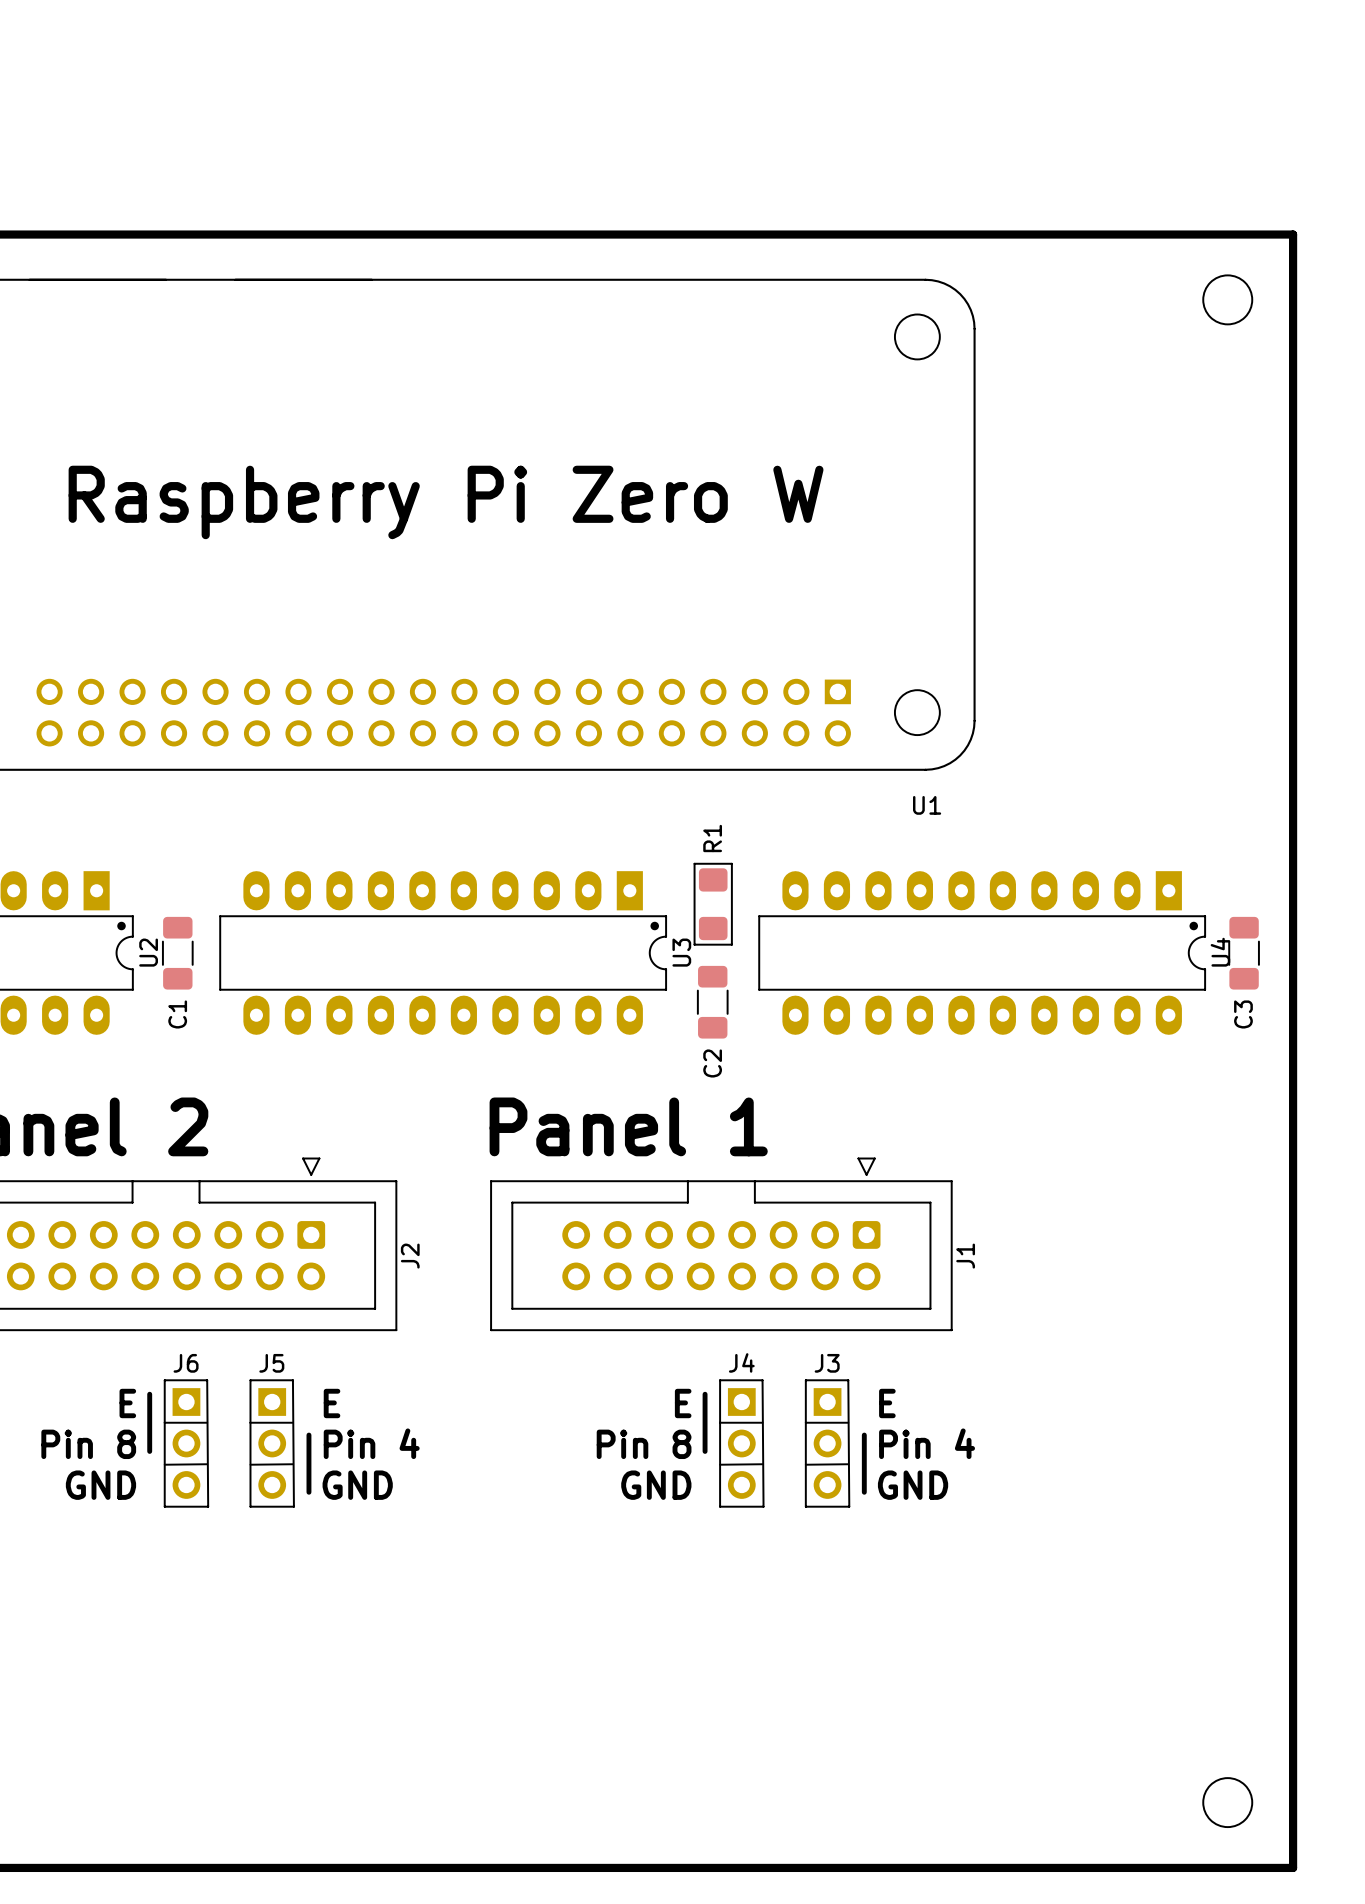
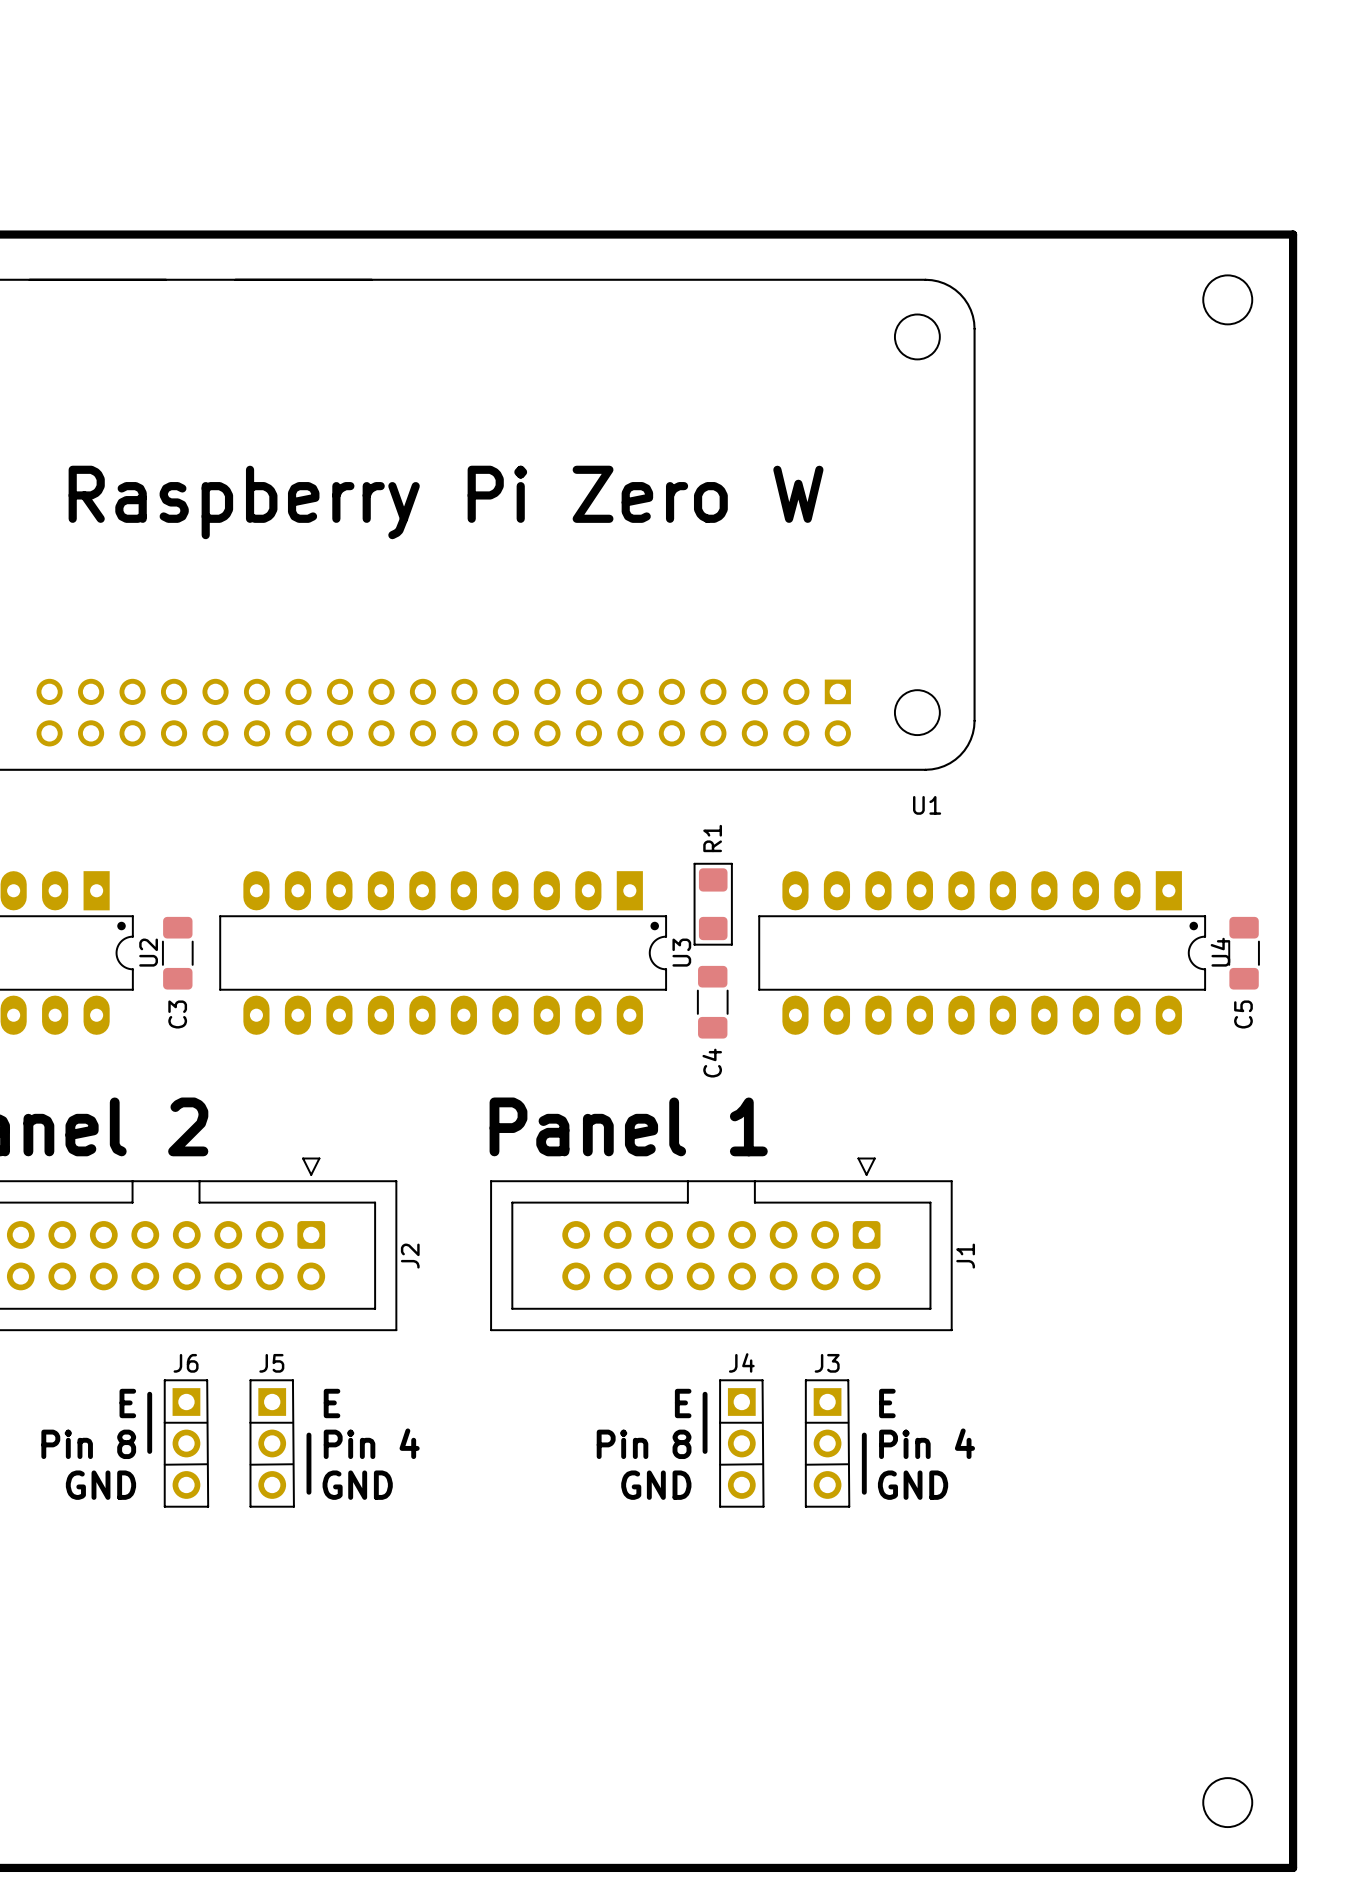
C1 name: C1 (177, 1014) -> C3 (177, 1014)
C3 name: C3 (1243, 1014) -> C5 (1243, 1014)
C2 name: C2 (712, 1063) -> C4 (712, 1063)

